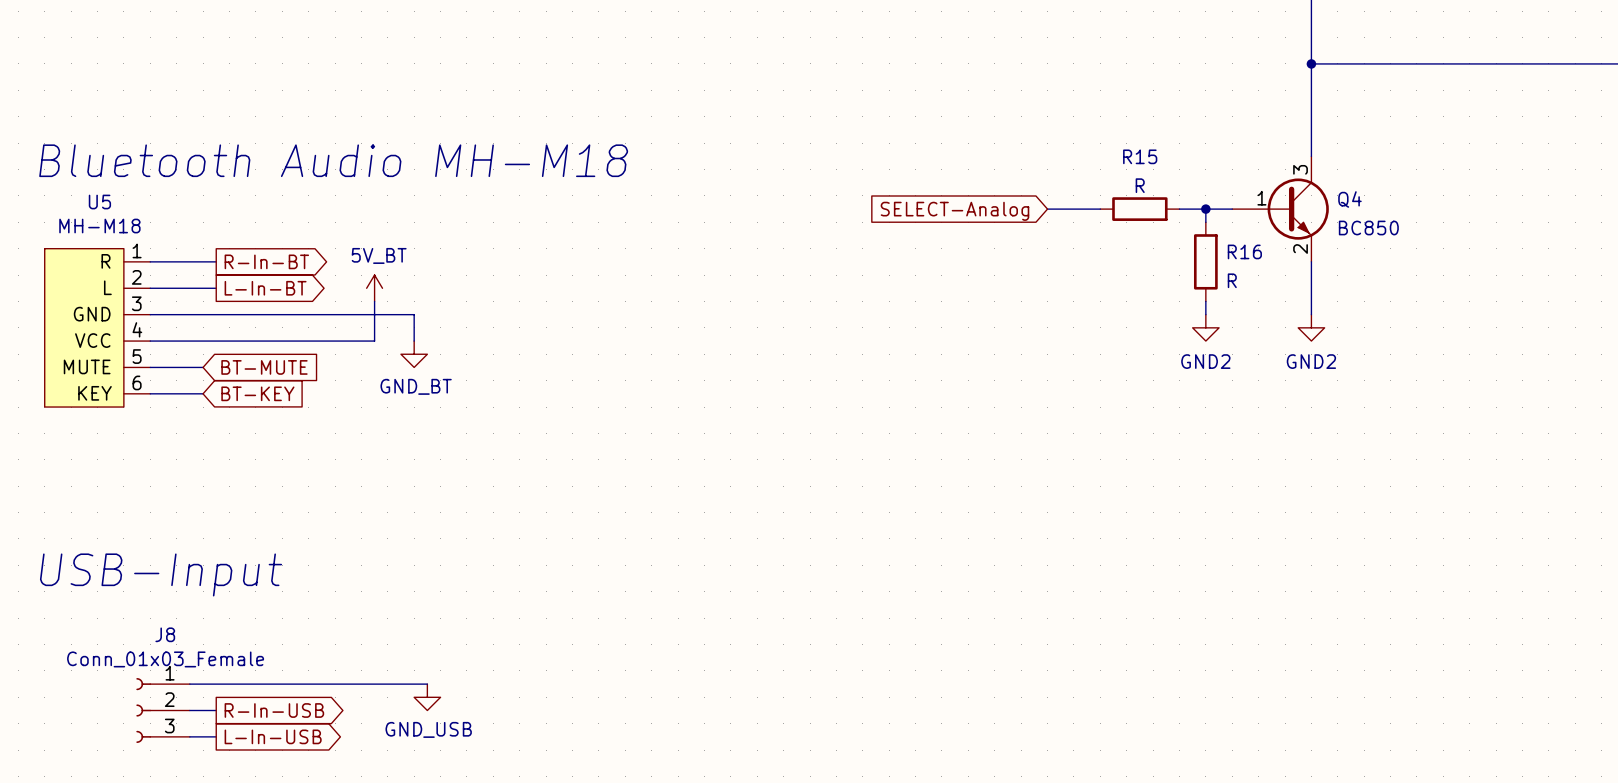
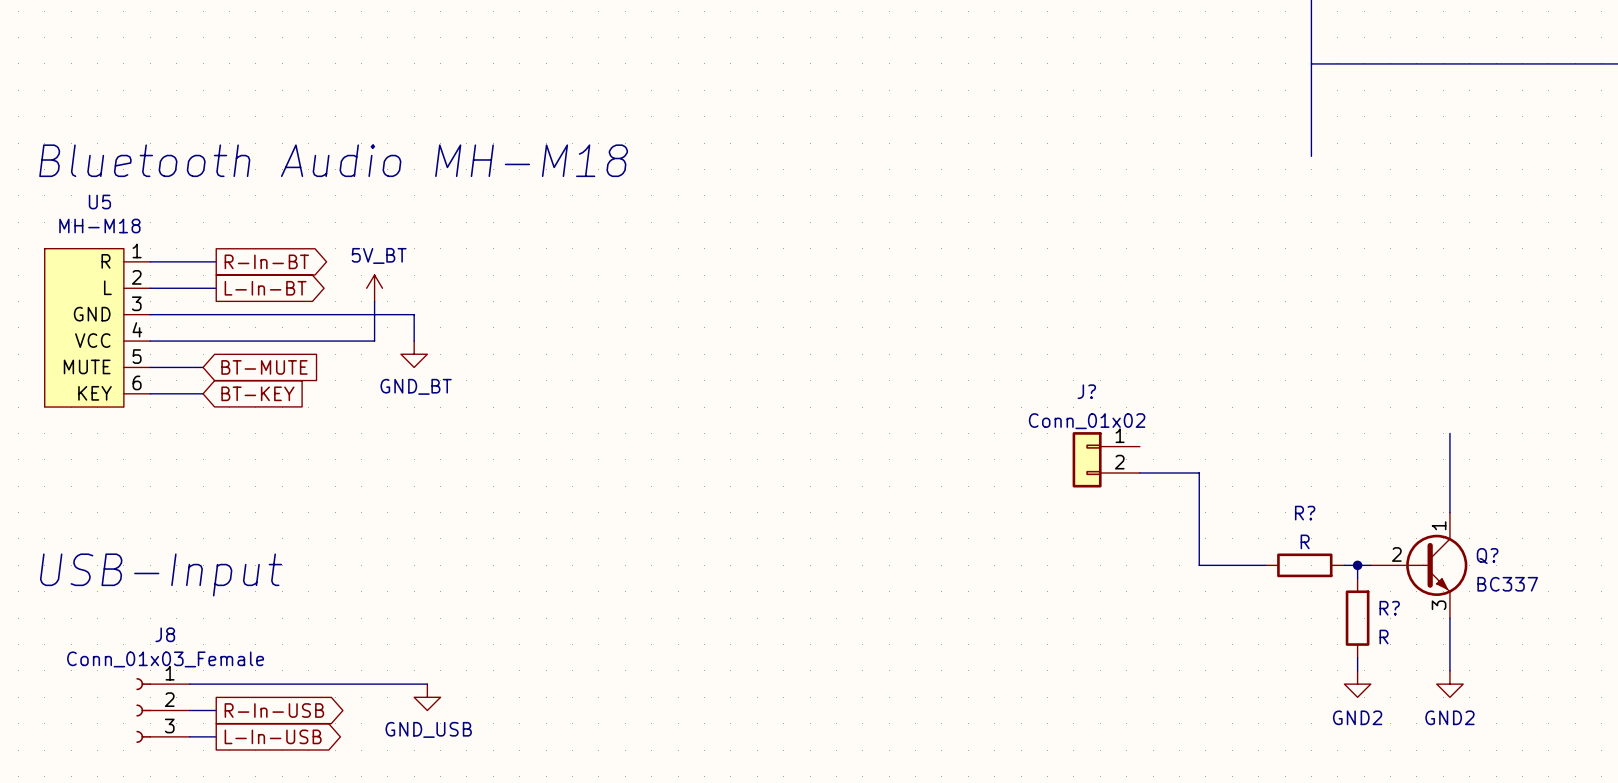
junction: (1311, 63) -> none
wire: (1047, 209) (1100, 209) -> none
R15: R (1139, 209) -> none
wire: (1179, 209) (1232, 209) -> none
wire: (1205, 209) (1205, 222) -> none
junction: (1205, 209) -> none
Q4: BC850 (1280, 209) -> none
global label: SELECT-Analog (954, 211) -> none
R16: R (1205, 261) -> none
wire: (1311, 261) (1311, 314) -> none
wire: (1205, 301) (1205, 314) -> none
power symbol: GND2 (1205, 327) -> none
power symbol: GND2 (1311, 327) -> none
wire: none -> (1449, 433) (1449, 512)
J?: none -> Conn_01x02 (1106, 459)
wire: none -> (1139, 472) (1199, 472) (1199, 565) (1265, 565)
R?: none -> R (1304, 565)
wire: none -> (1344, 565) (1370, 565)
wire: none -> (1357, 565) (1357, 578)
junction: none -> (1357, 565)
Q?: none -> BC337 (1419, 565)
R?: none -> R (1357, 618)
wire: none -> (1449, 618) (1449, 670)
wire: none -> (1357, 657) (1357, 670)
power symbol: none -> GND2 (1357, 684)
power symbol: none -> GND2 (1449, 684)

